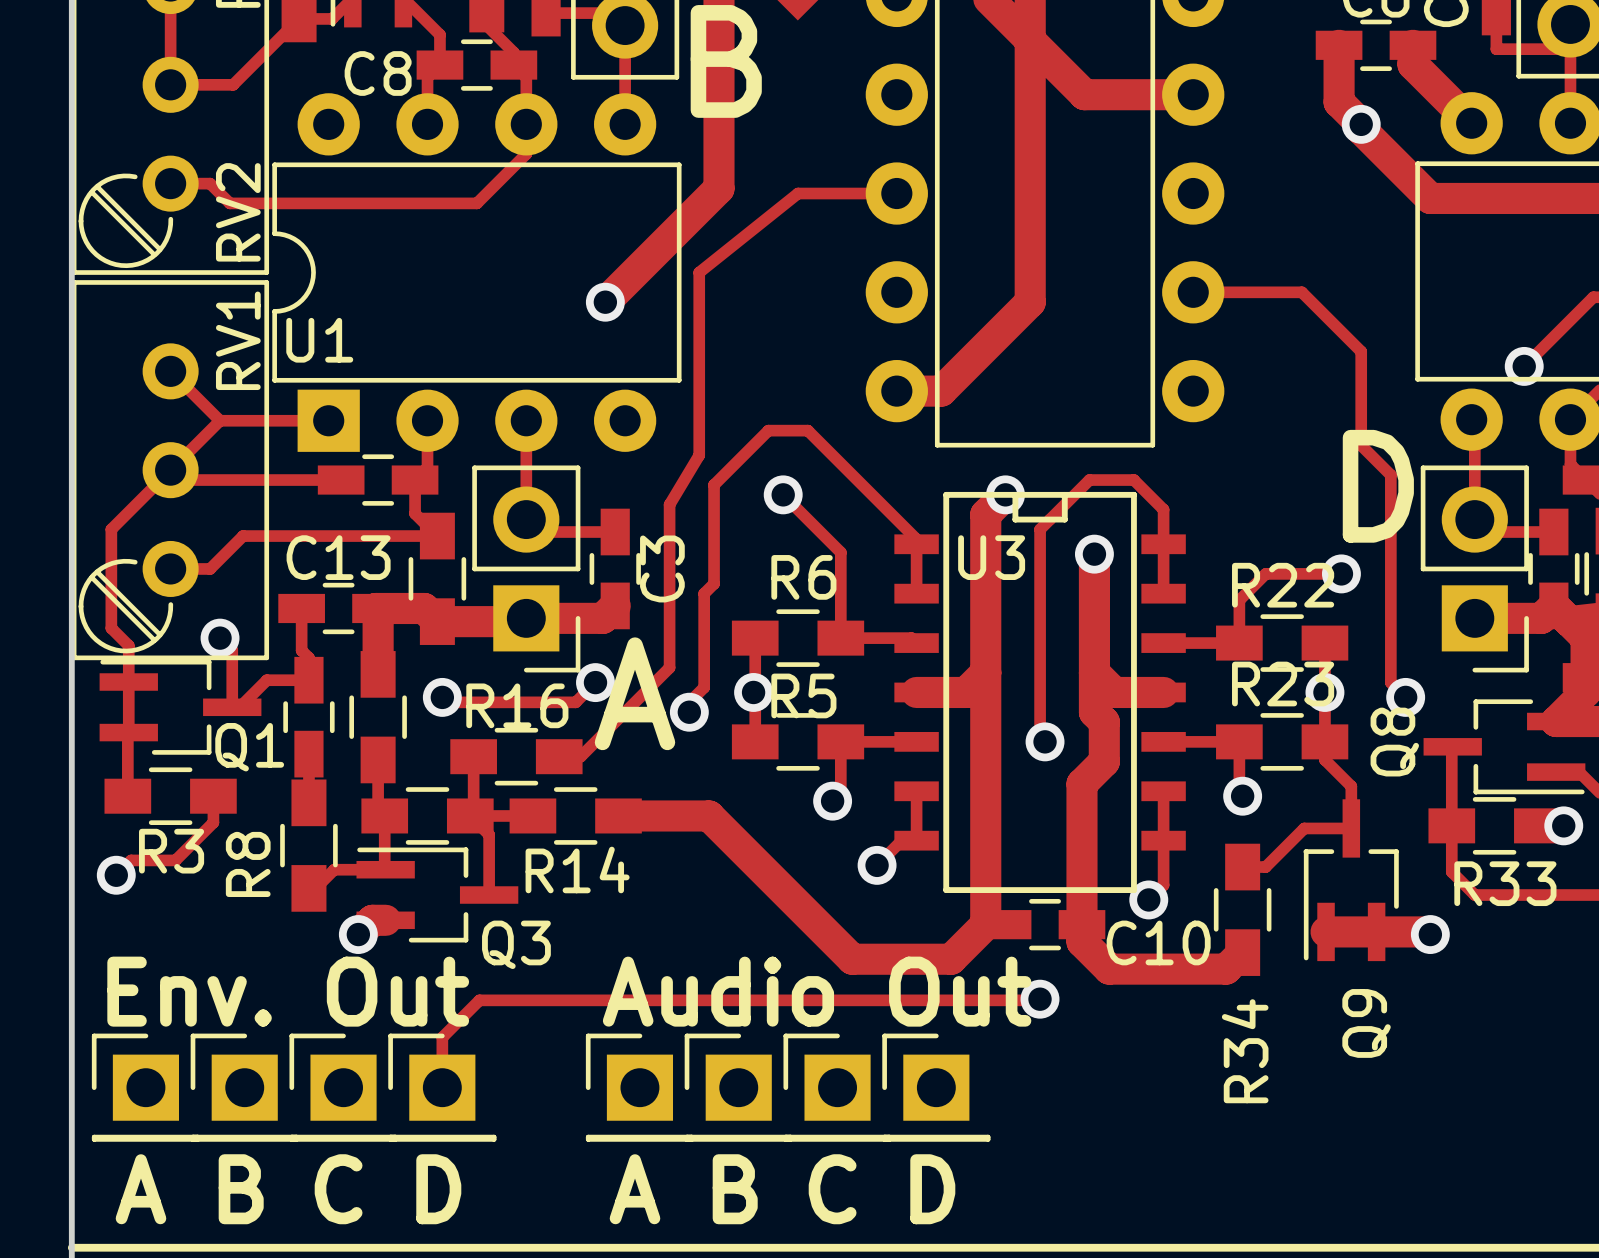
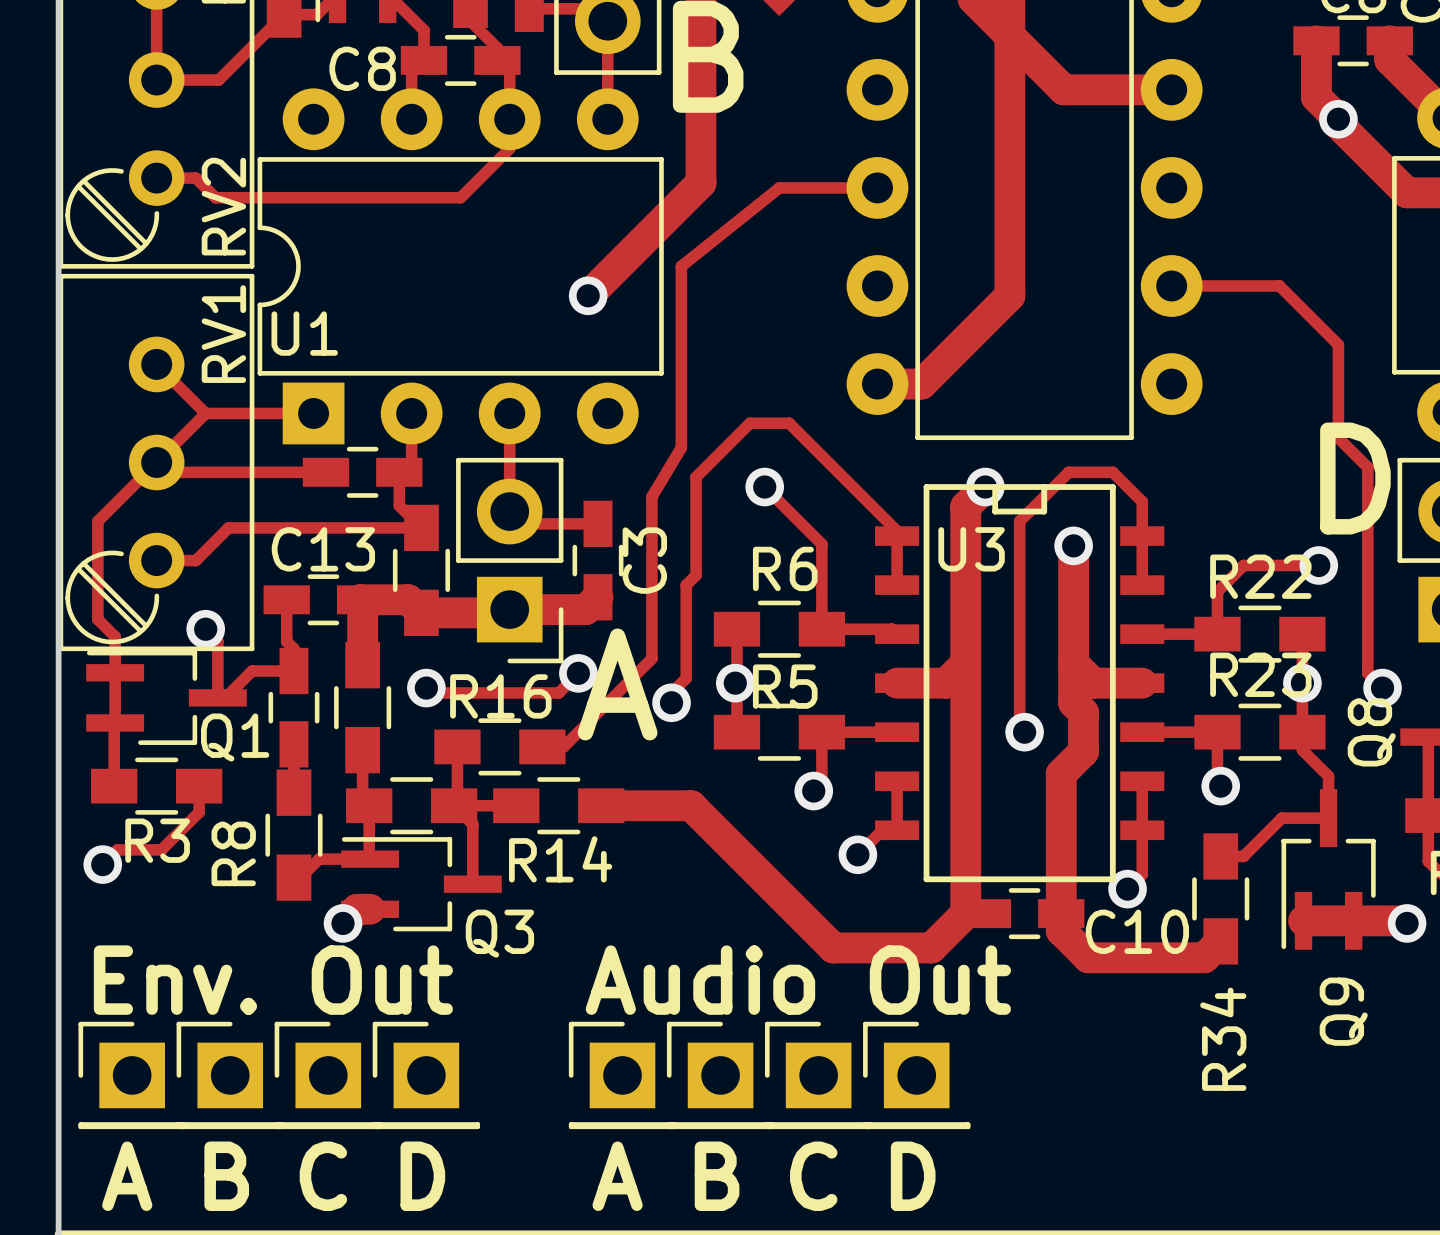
track: (1040, 999) (479, 1000) (442, 1037) (442, 1087) -> none
via: (1040, 999) -> none

